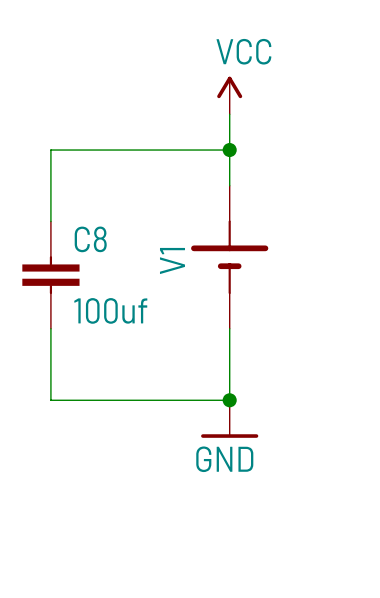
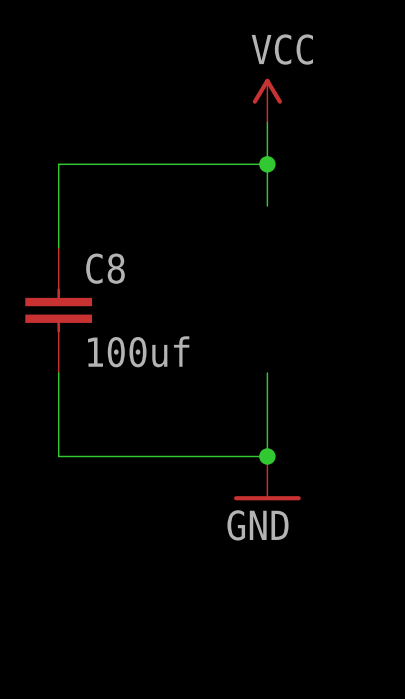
V1: (229, 257) -> none

